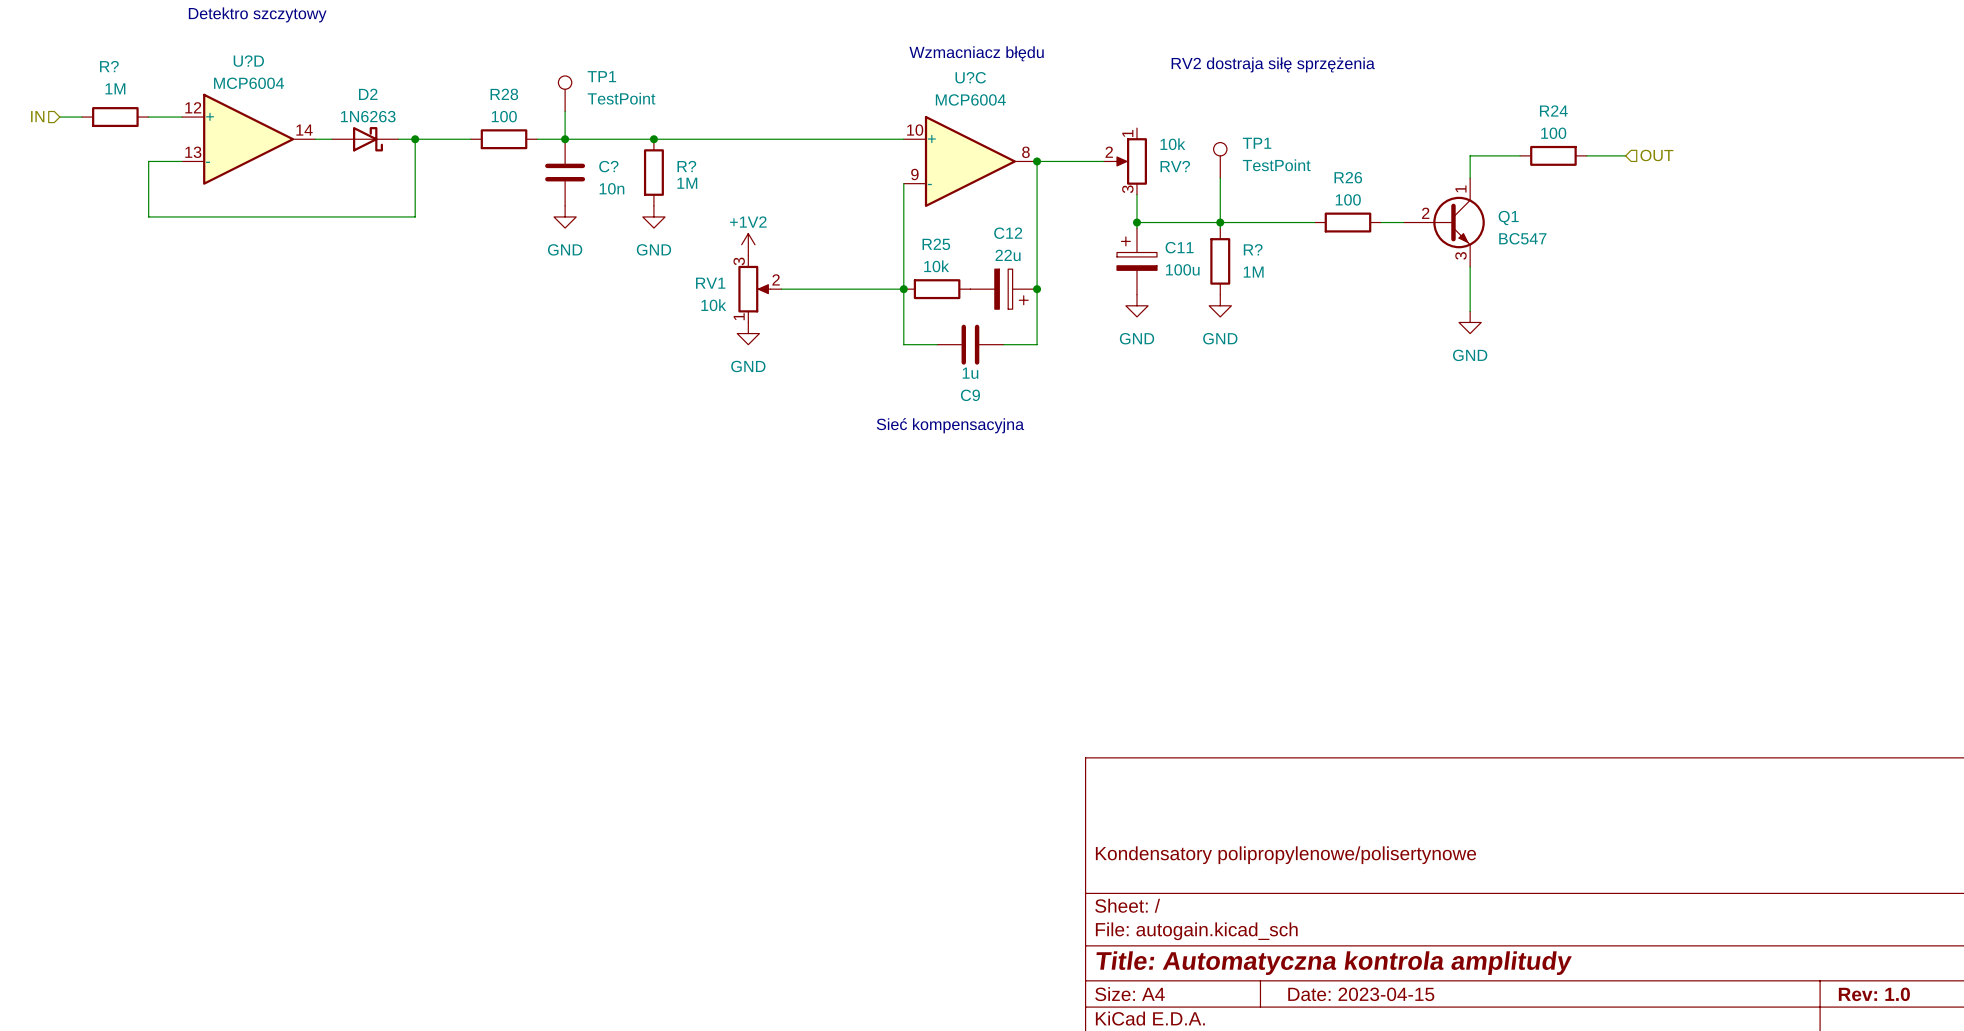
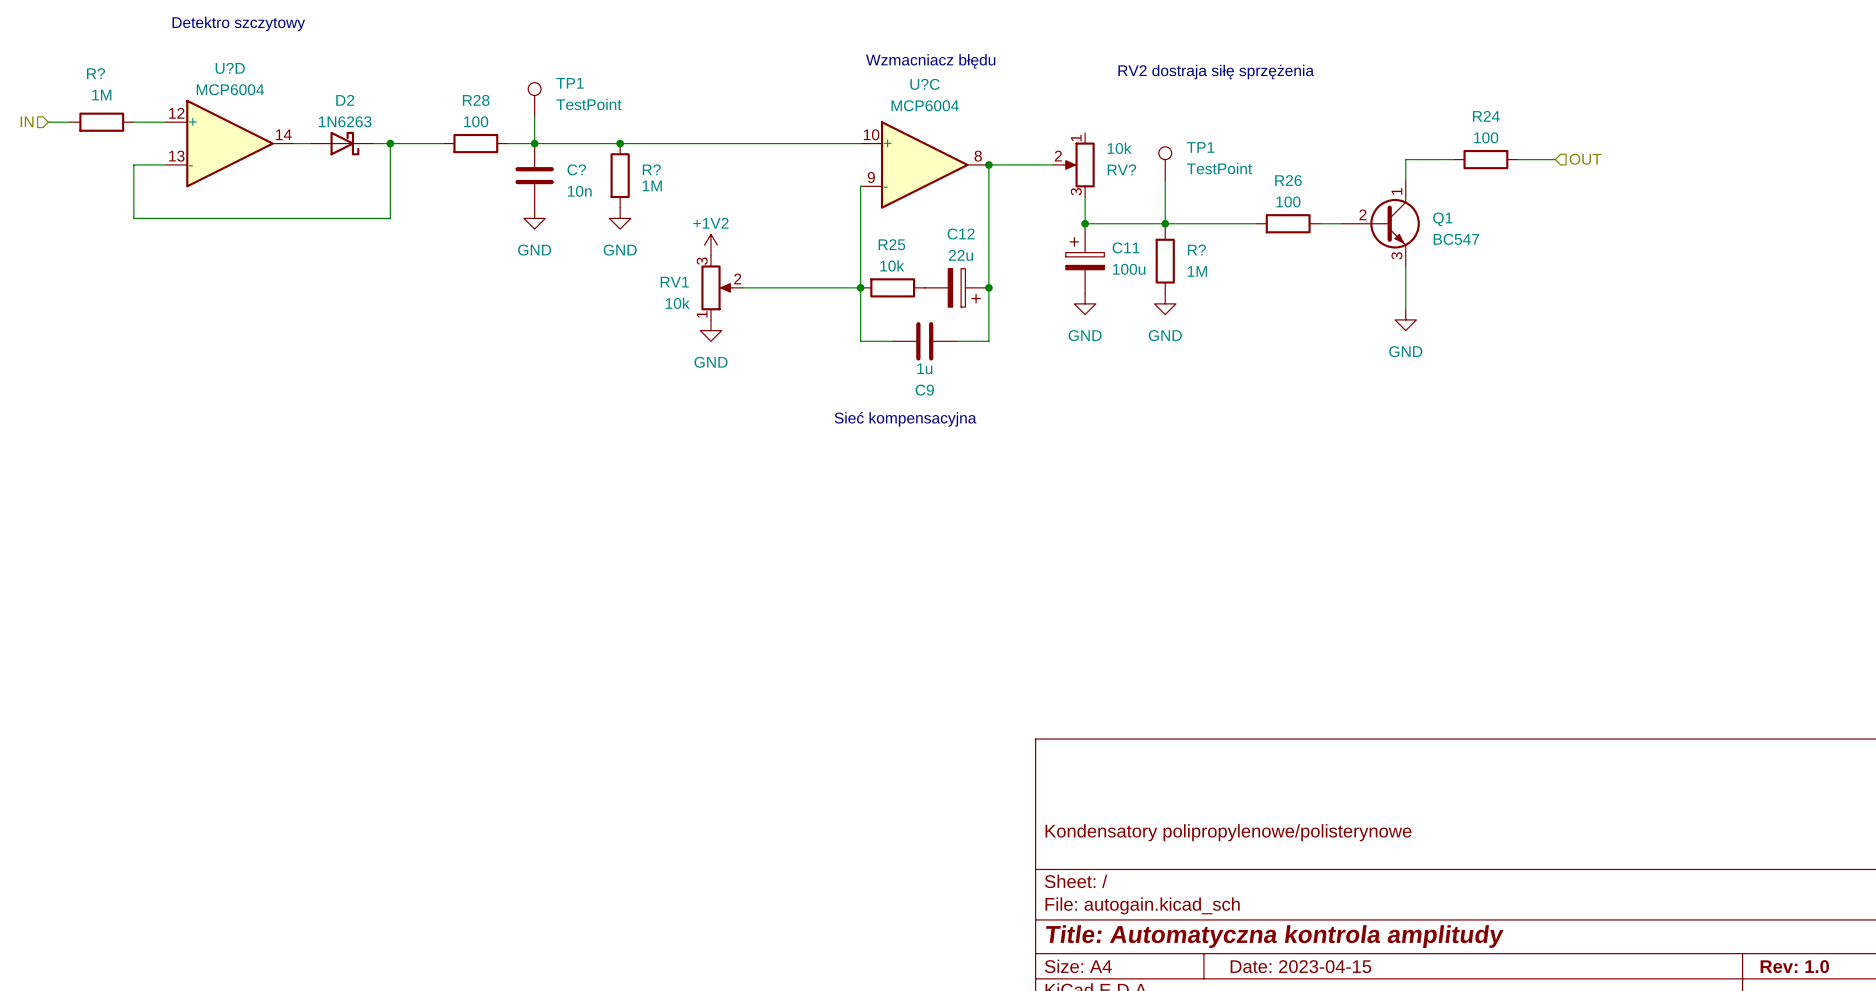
title block: Kondensatory polipropylenowe/polisertynowe (1285, 855) -> Kondensatory polipropylenowe/polisterynowe (1228, 832)

